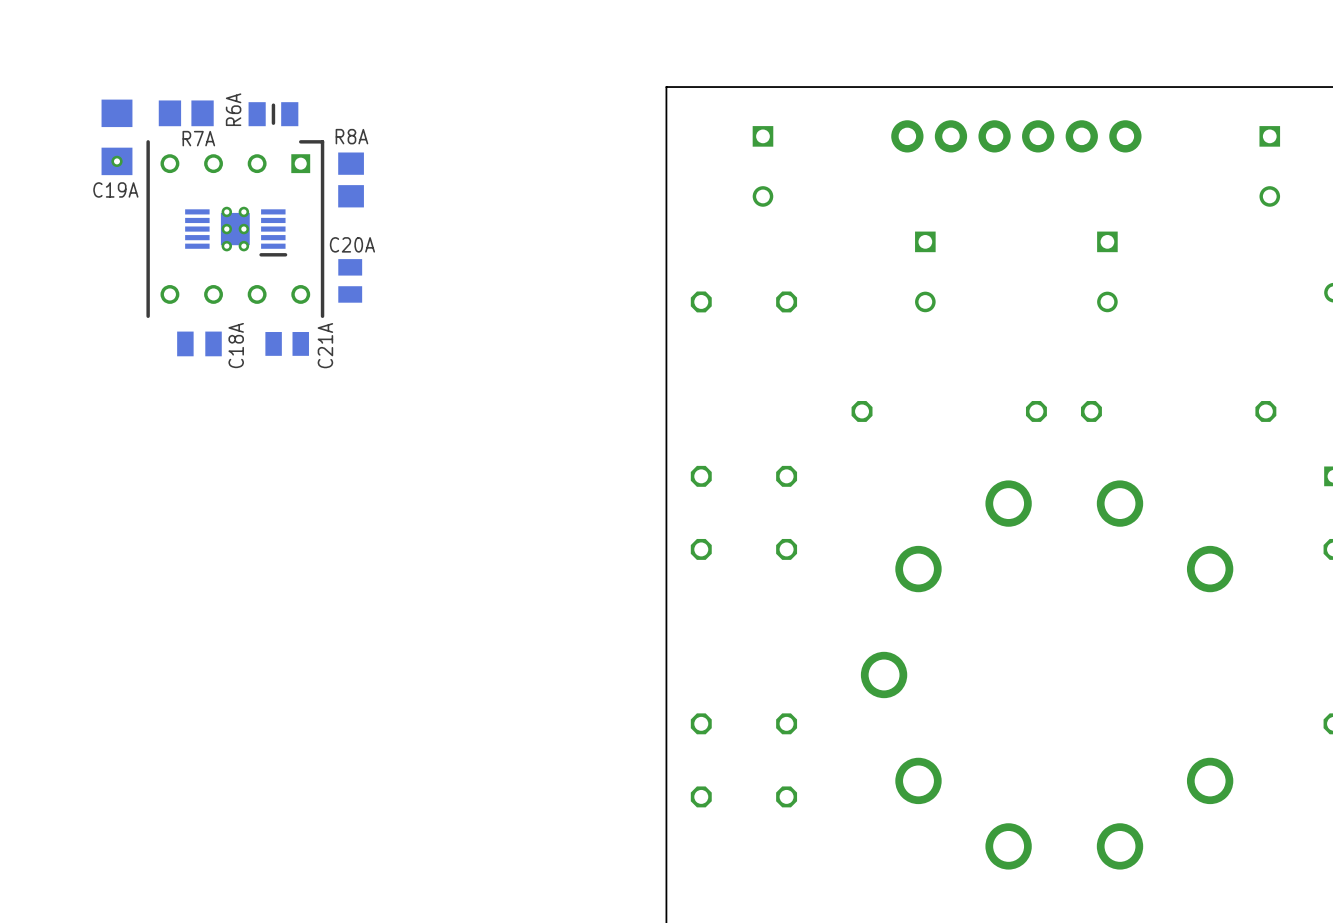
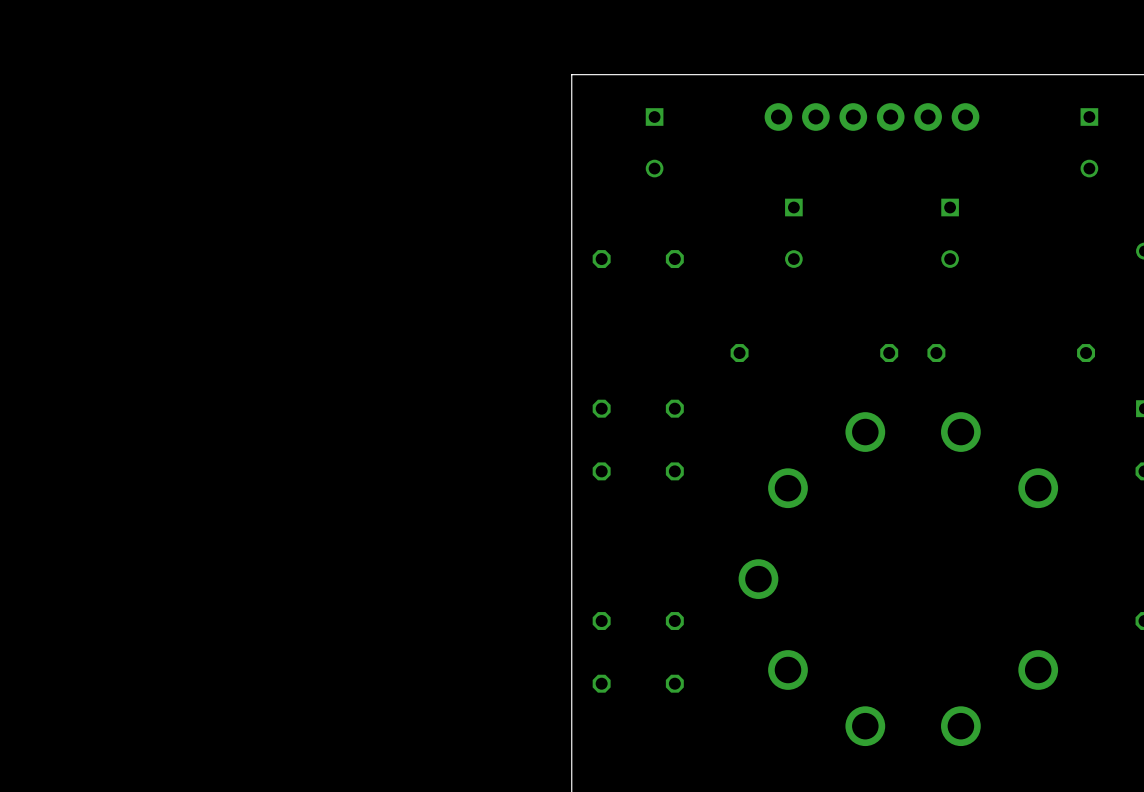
R7A: (186, 113) -> none
R6A: (273, 114) -> none
C19A: (116, 137) -> none
R8A: (351, 179) -> none
part: (235, 229) -> none
part: (236, 231) -> none
C20A: (350, 280) -> none
C18A: (199, 343) -> none
C21A: (287, 343) -> none

